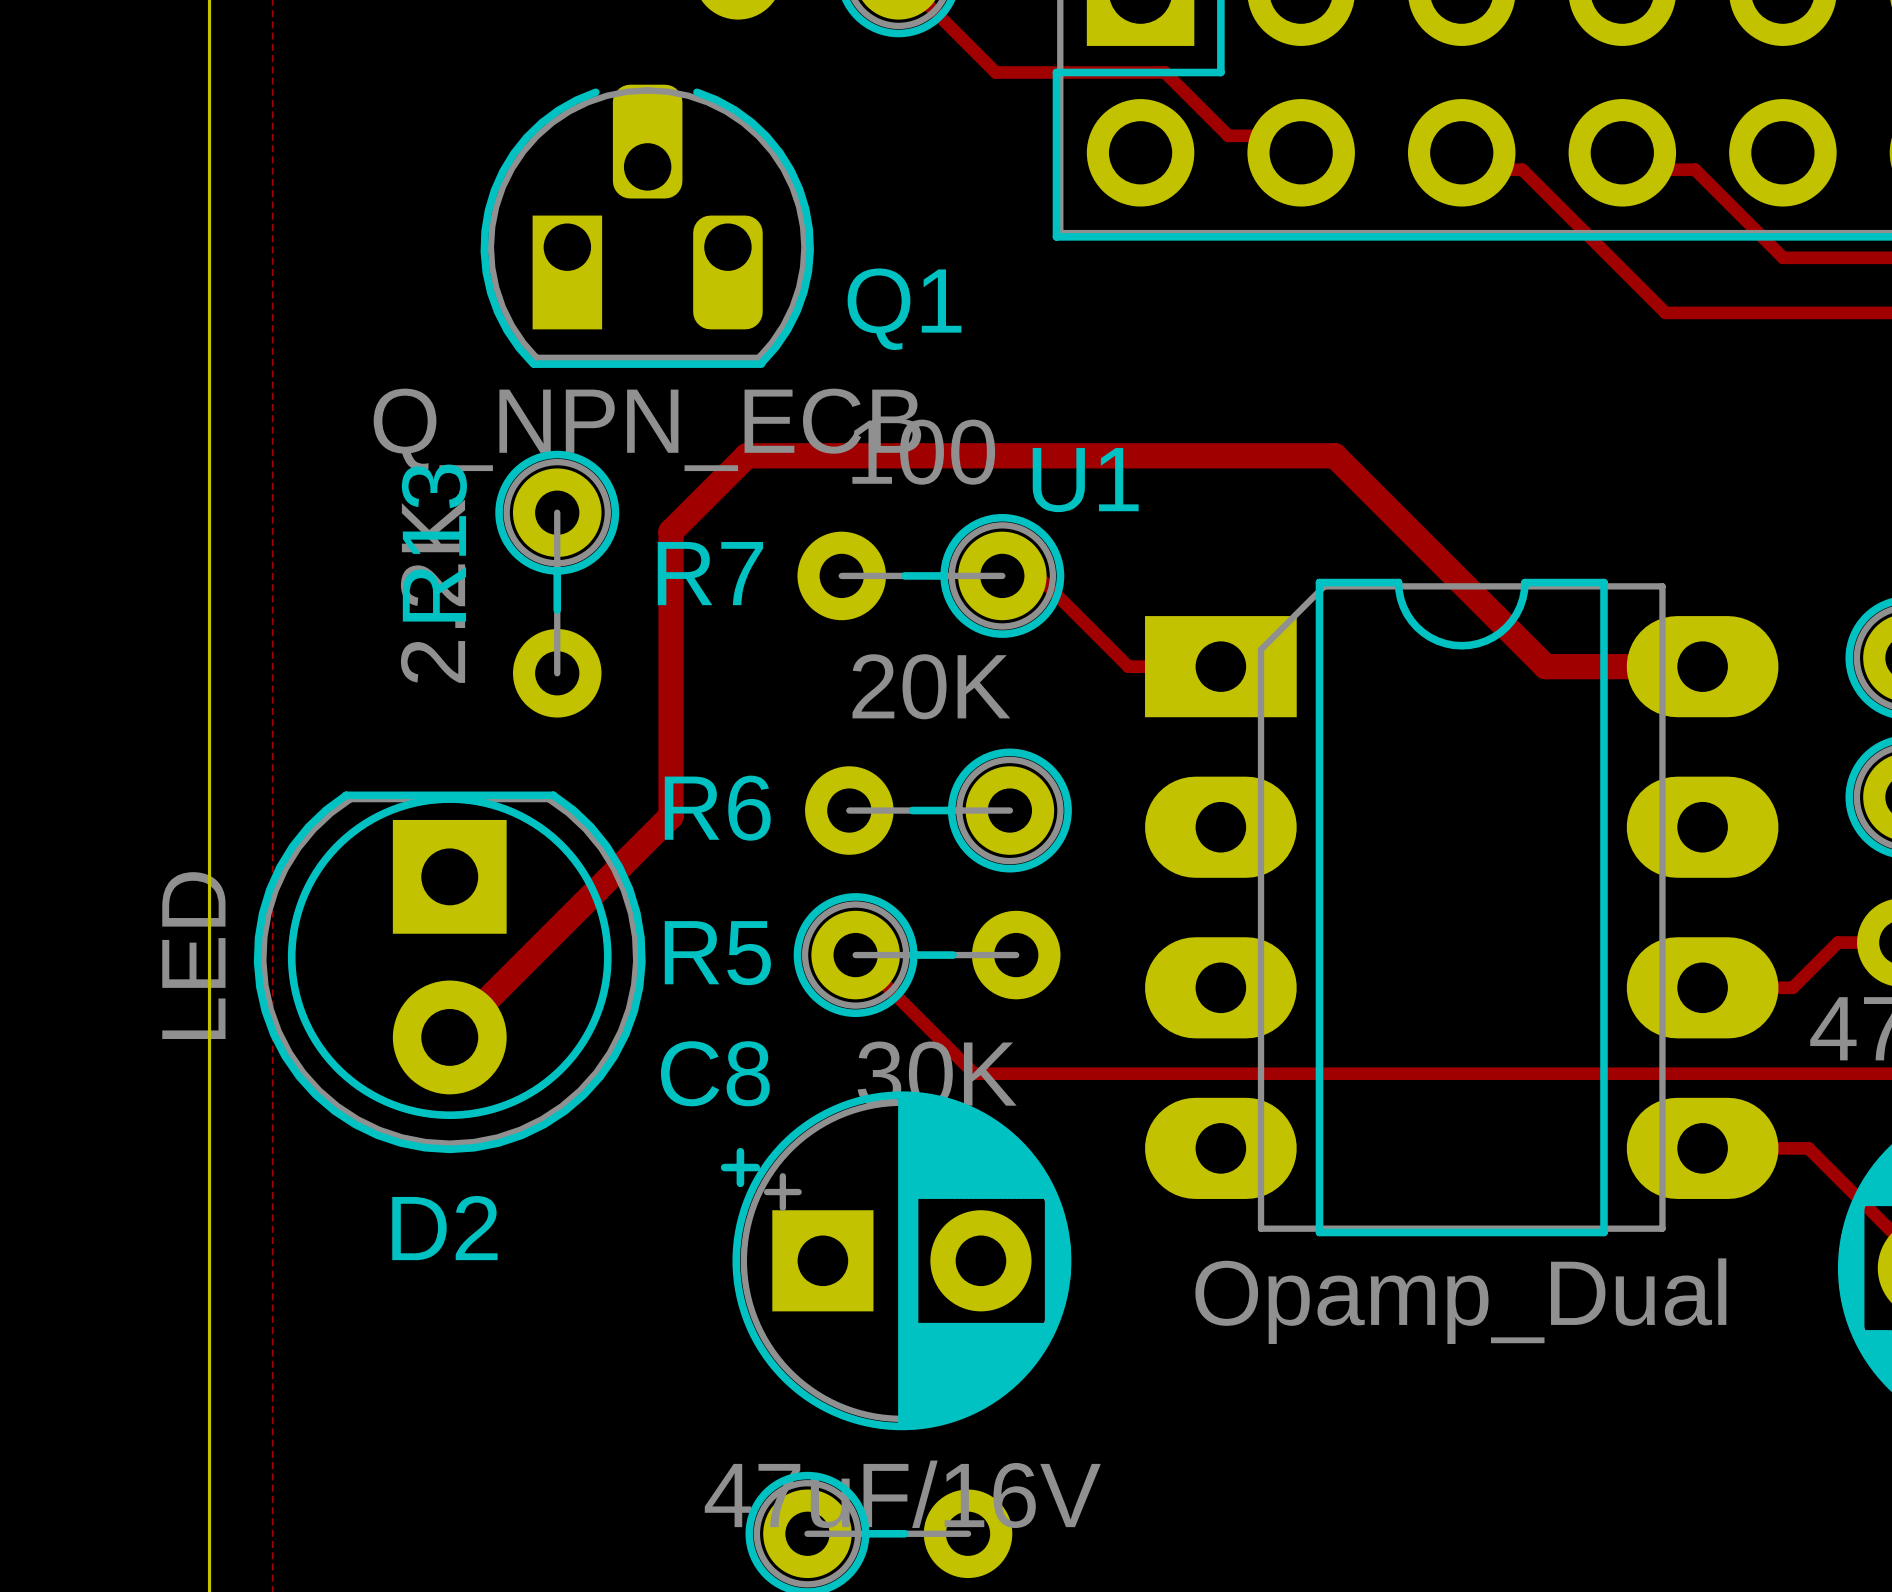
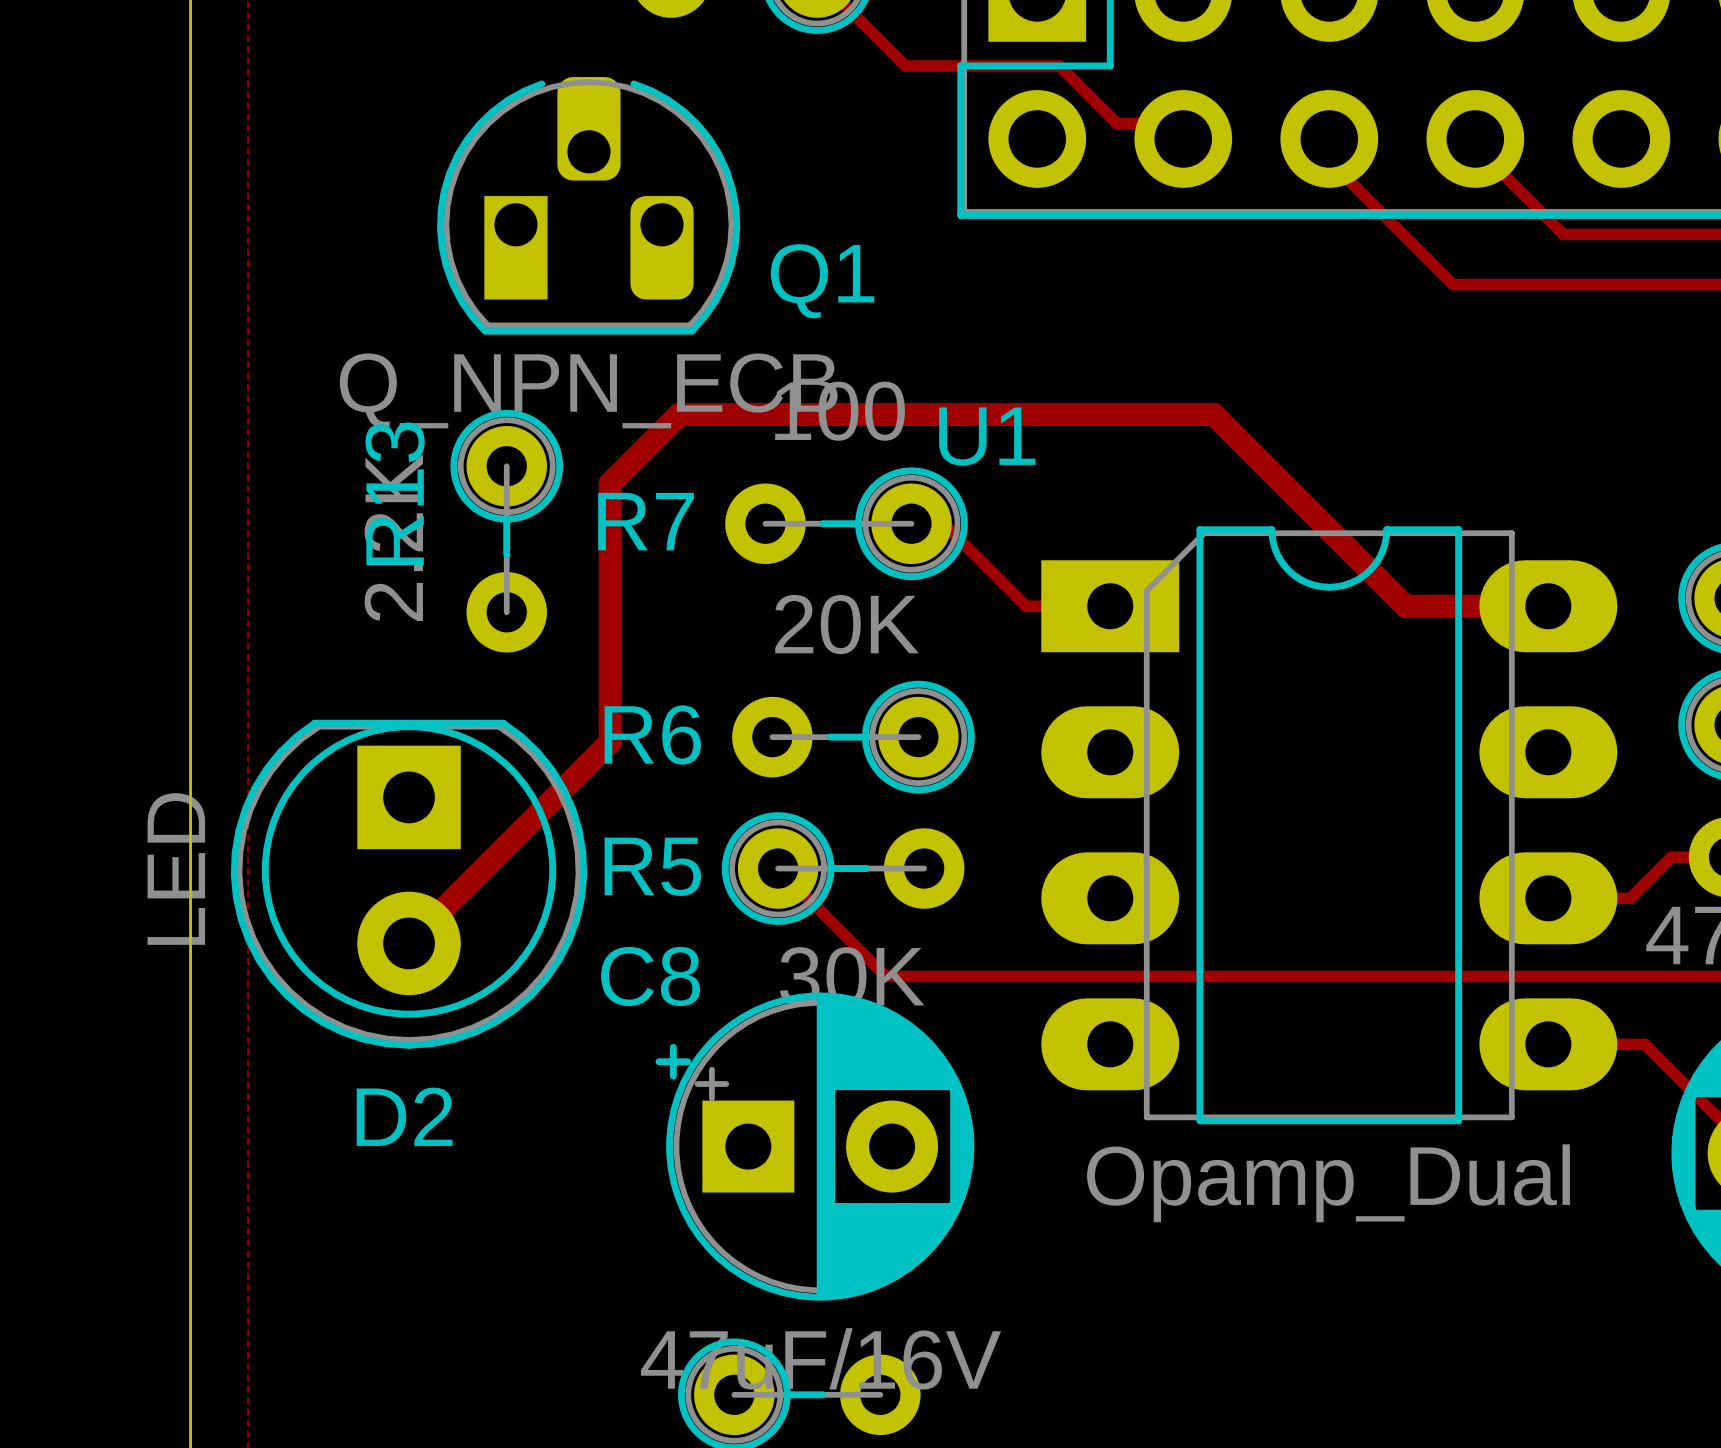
track: (1478, 169) (1522, 169) (1665, 312) -> (1344, 154) (1344, 176) (1453, 284) (1514, 284)
track: (1639, 169) (1695, 169) (1783, 257) -> (1490, 154) (1490, 161) (1563, 234) (1621, 234)

